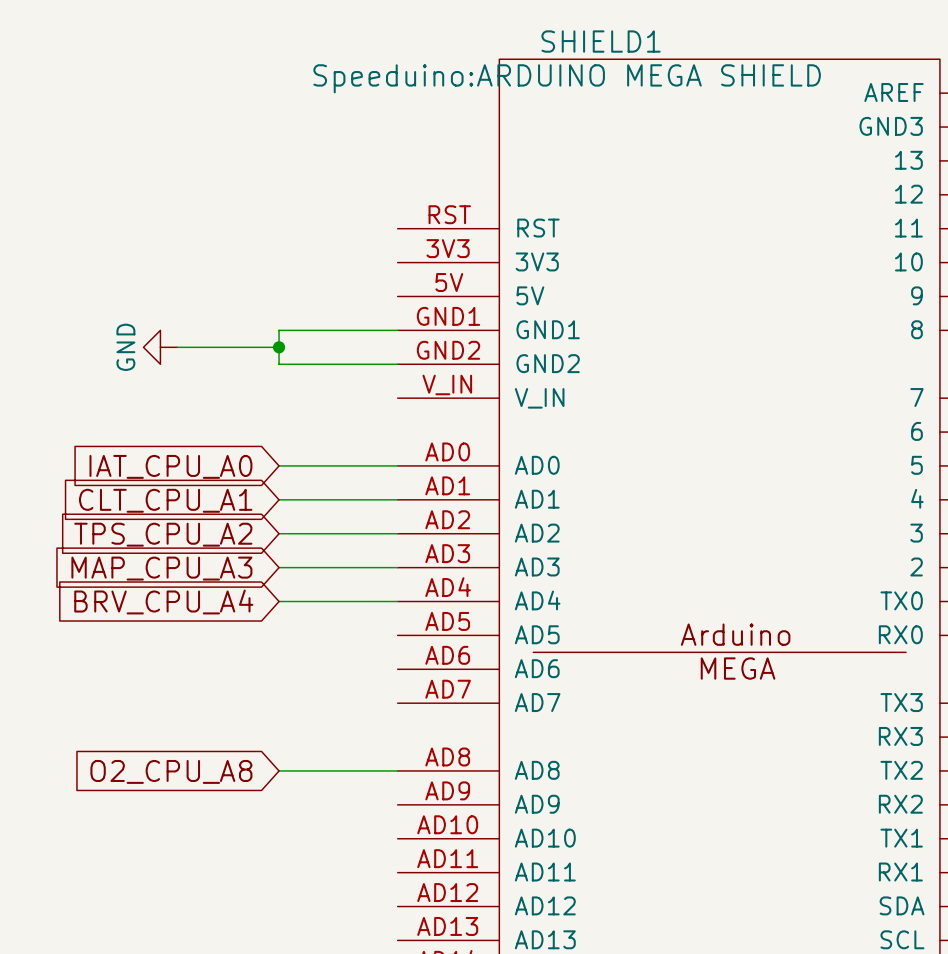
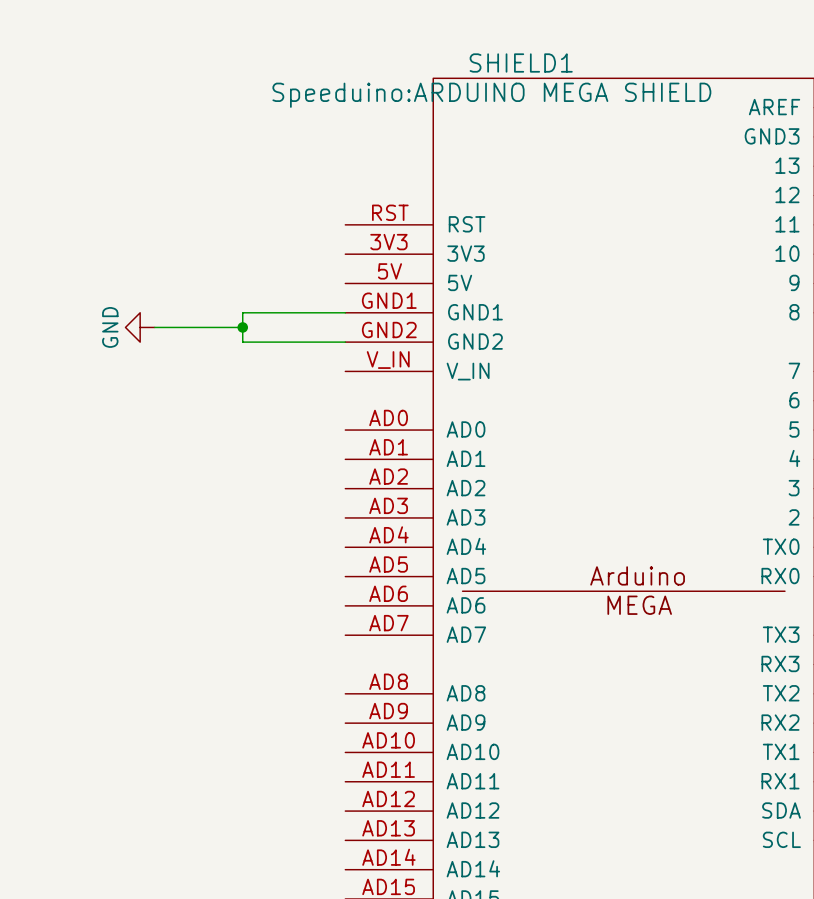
wire: (279, 465) (397, 465) -> none
global label: IAT_CPU_A0 (170, 466) -> none
wire: (279, 499) (397, 499) -> none
global label: CLT_CPU_A1 (165, 500) -> none
wire: (279, 533) (397, 533) -> none
global label: TPS_CPU_A2 (163, 534) -> none
wire: (279, 567) (397, 567) -> none
global label: MAP_CPU_A3 (161, 568) -> none
global label: BRV_CPU_A4 (163, 601) -> none
wire: (279, 601) (397, 601) -> none
wire: (279, 770) (397, 770) -> none
global label: O2_CPU_A8 (171, 771) -> none

